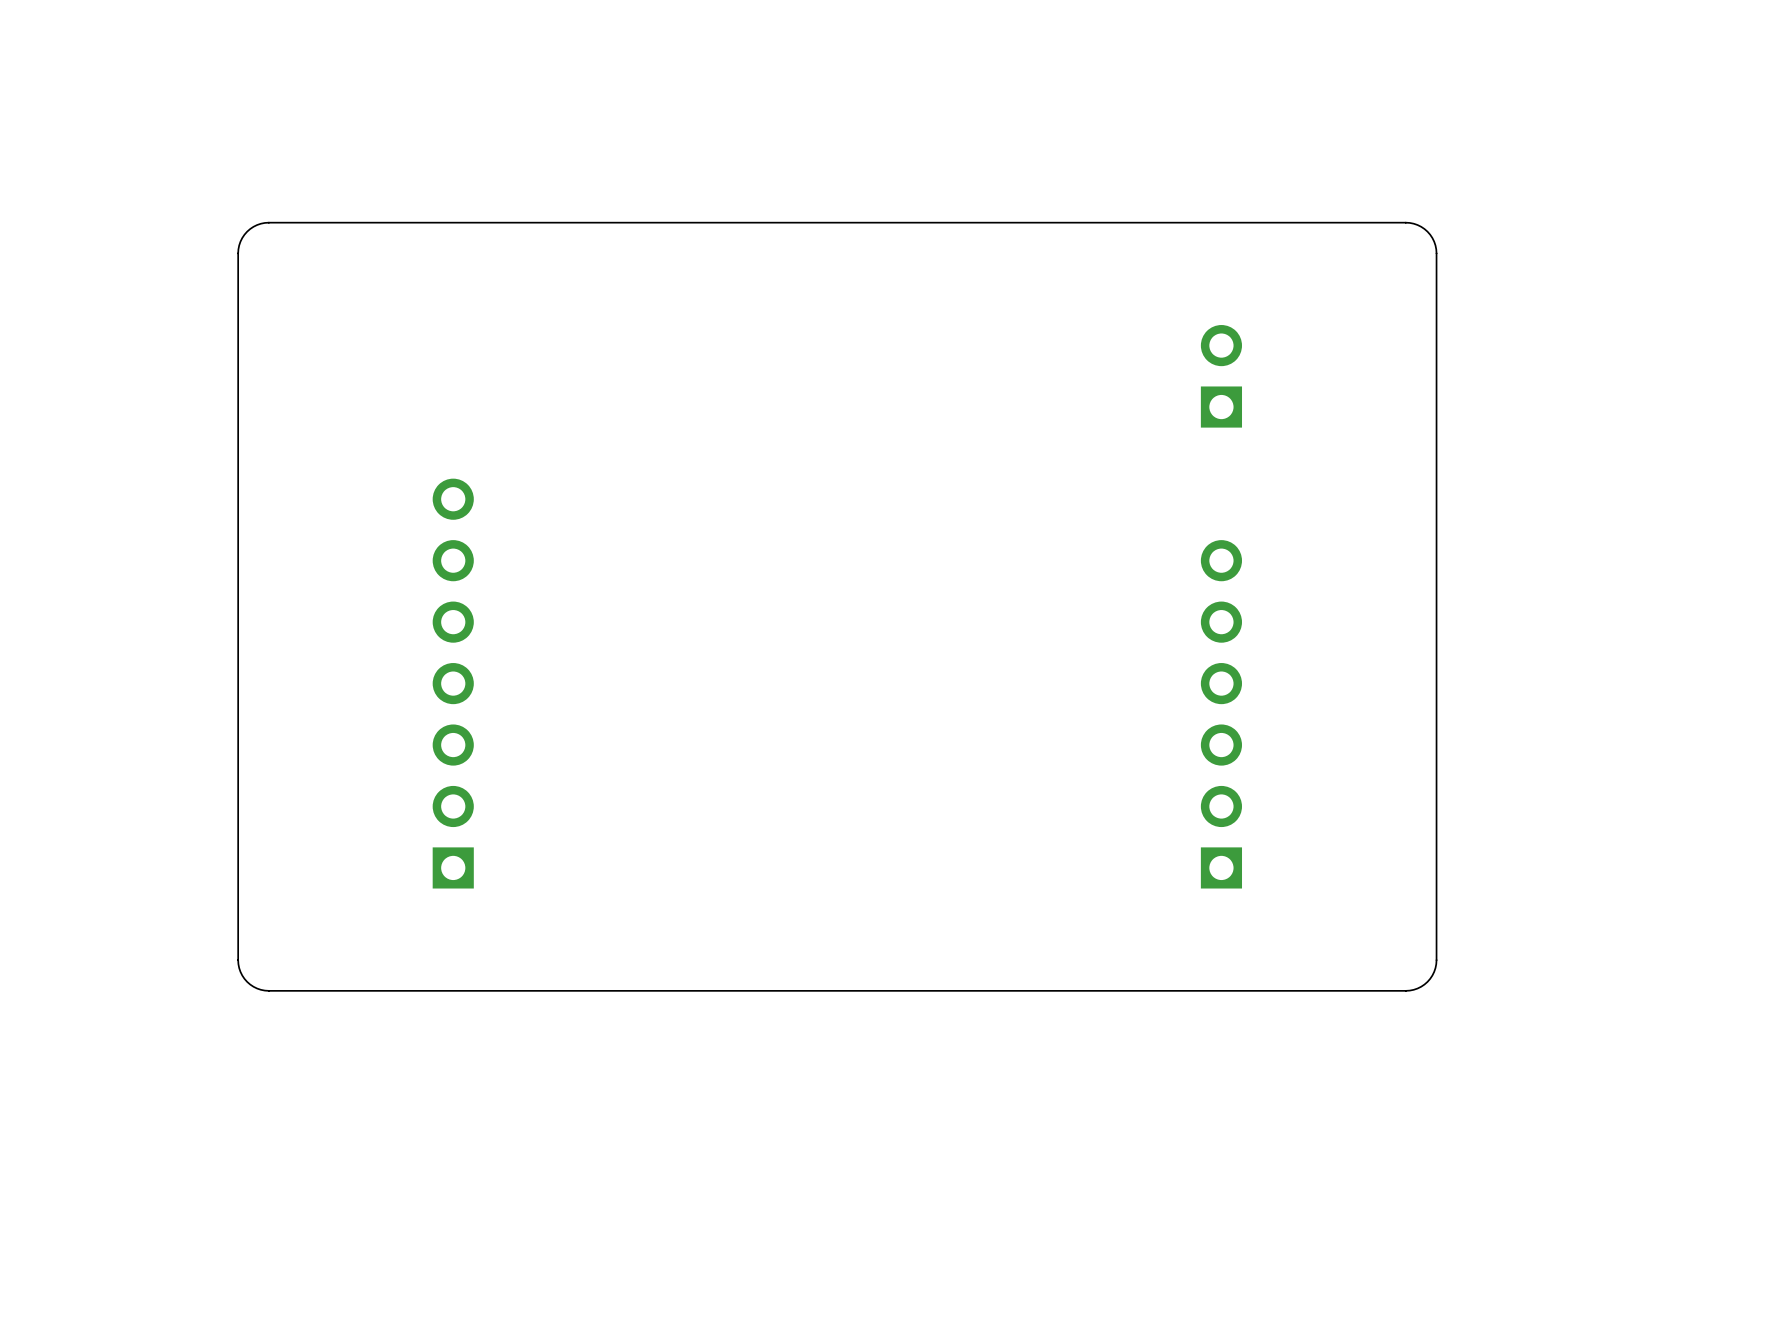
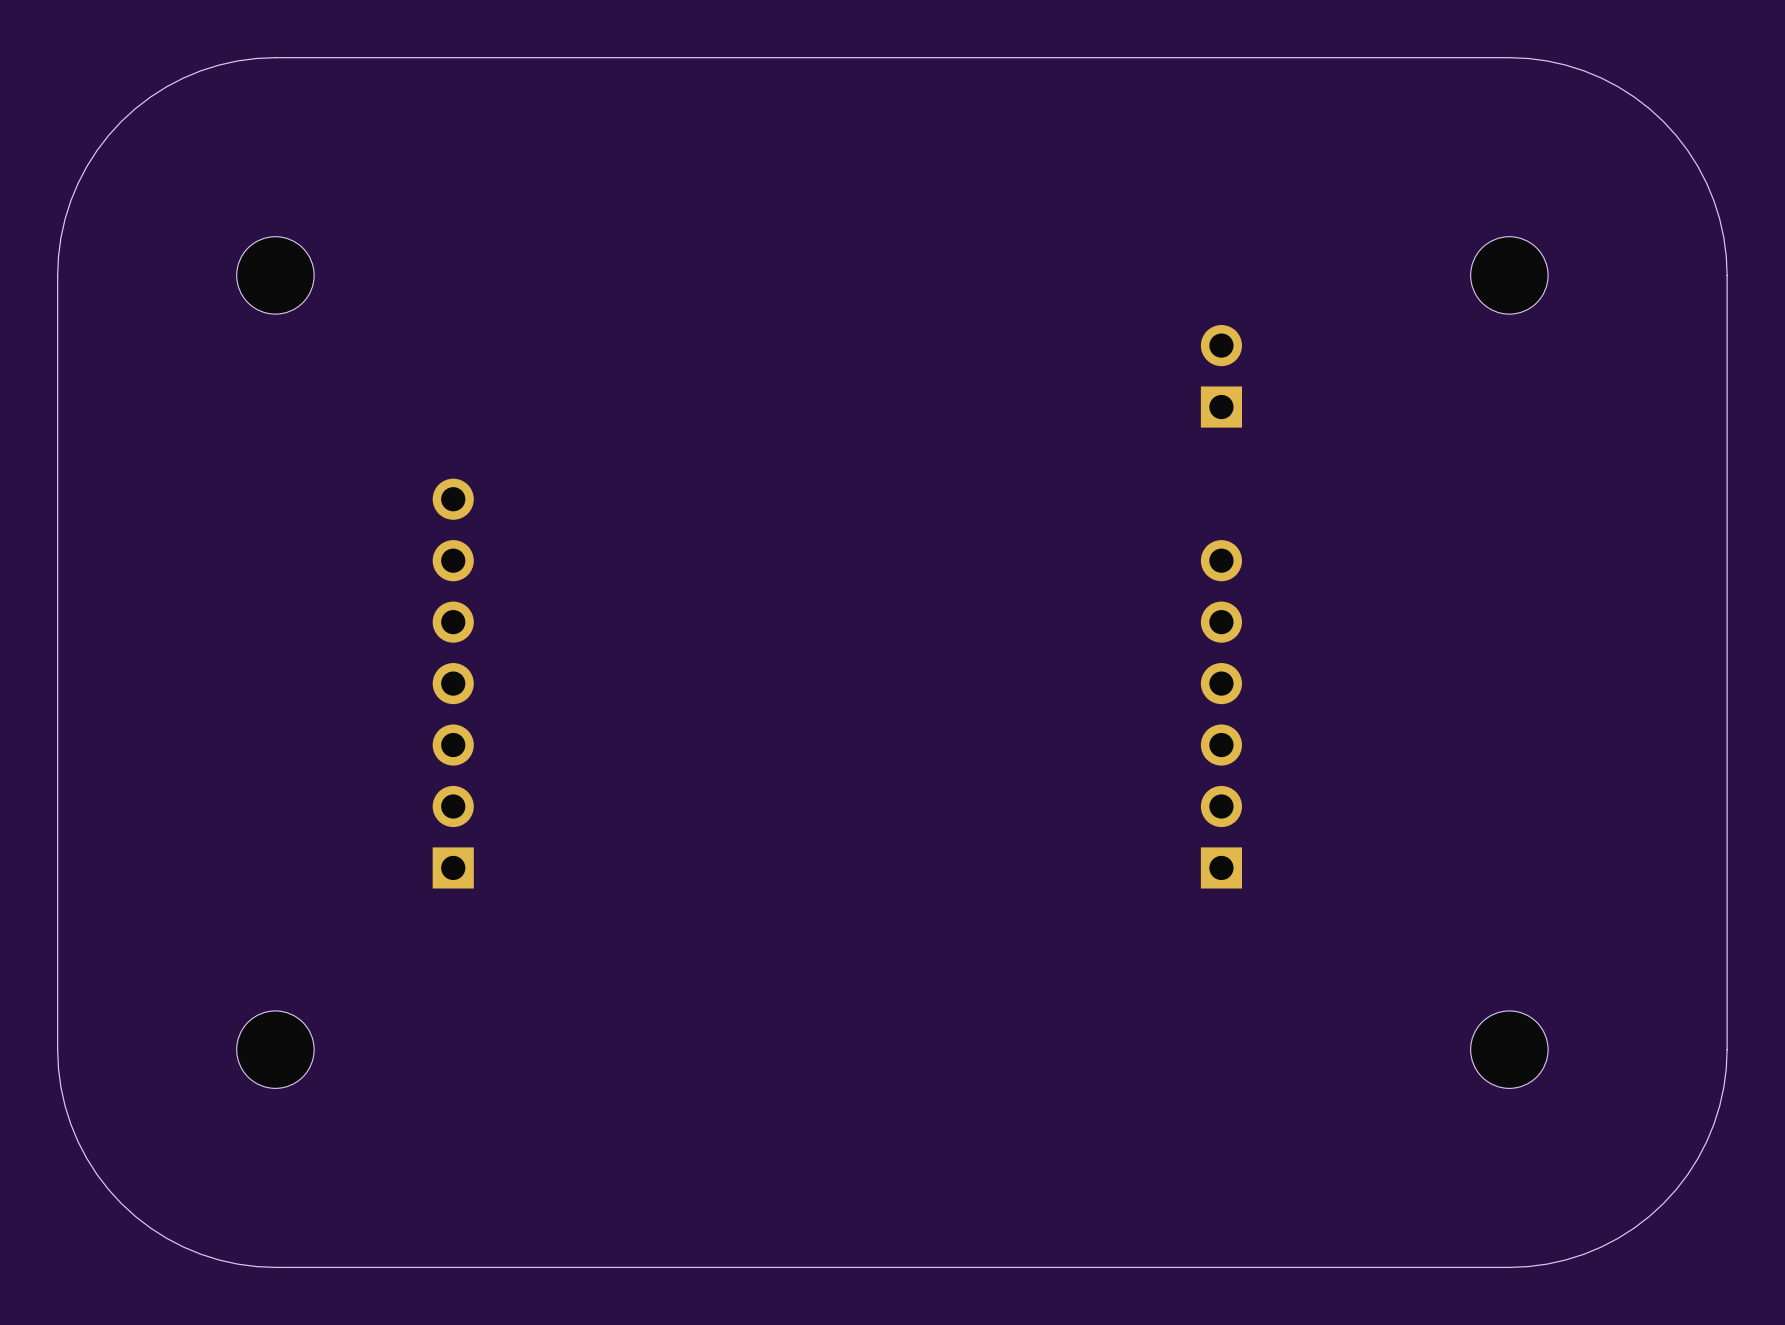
board edge: none -> (1509, 57) (275, 57) (237, 60) (200, 70) (166, 86) (135, 108) (108, 135) (97, 150) (78, 183) (65, 219) (60, 237) (57, 275) (58, 1068) (65, 1106) (78, 1141) (97, 1174) (108, 1189) (135, 1216) (166, 1238) (183, 1247) (219, 1259) (237, 1264) (275, 1267) (1509, 1267) (1547, 1264) (1583, 1254) (1618, 1238) (1649, 1216) (1676, 1189) (1697, 1158) (1713, 1124) (1719, 1106) (1726, 1068) (1726, 256) (1719, 219) (1713, 200) (1697, 166) (1676, 135) (1649, 108) (1618, 86) (1583, 70) (1547, 60) (1509, 57)
board edge: (1405, 222) (268, 222) (253, 226) (242, 238) (238, 253) (238, 960) (242, 975) (253, 986) (268, 990) (1405, 990) (1421, 986) (1432, 975) (1436, 960) (1436, 253) (1434, 241) (1427, 231) (1417, 225) (1405, 222) -> none
part: none -> (275, 275)
part: none -> (1509, 275)
part: none -> (275, 1049)
part: none -> (1509, 1049)

